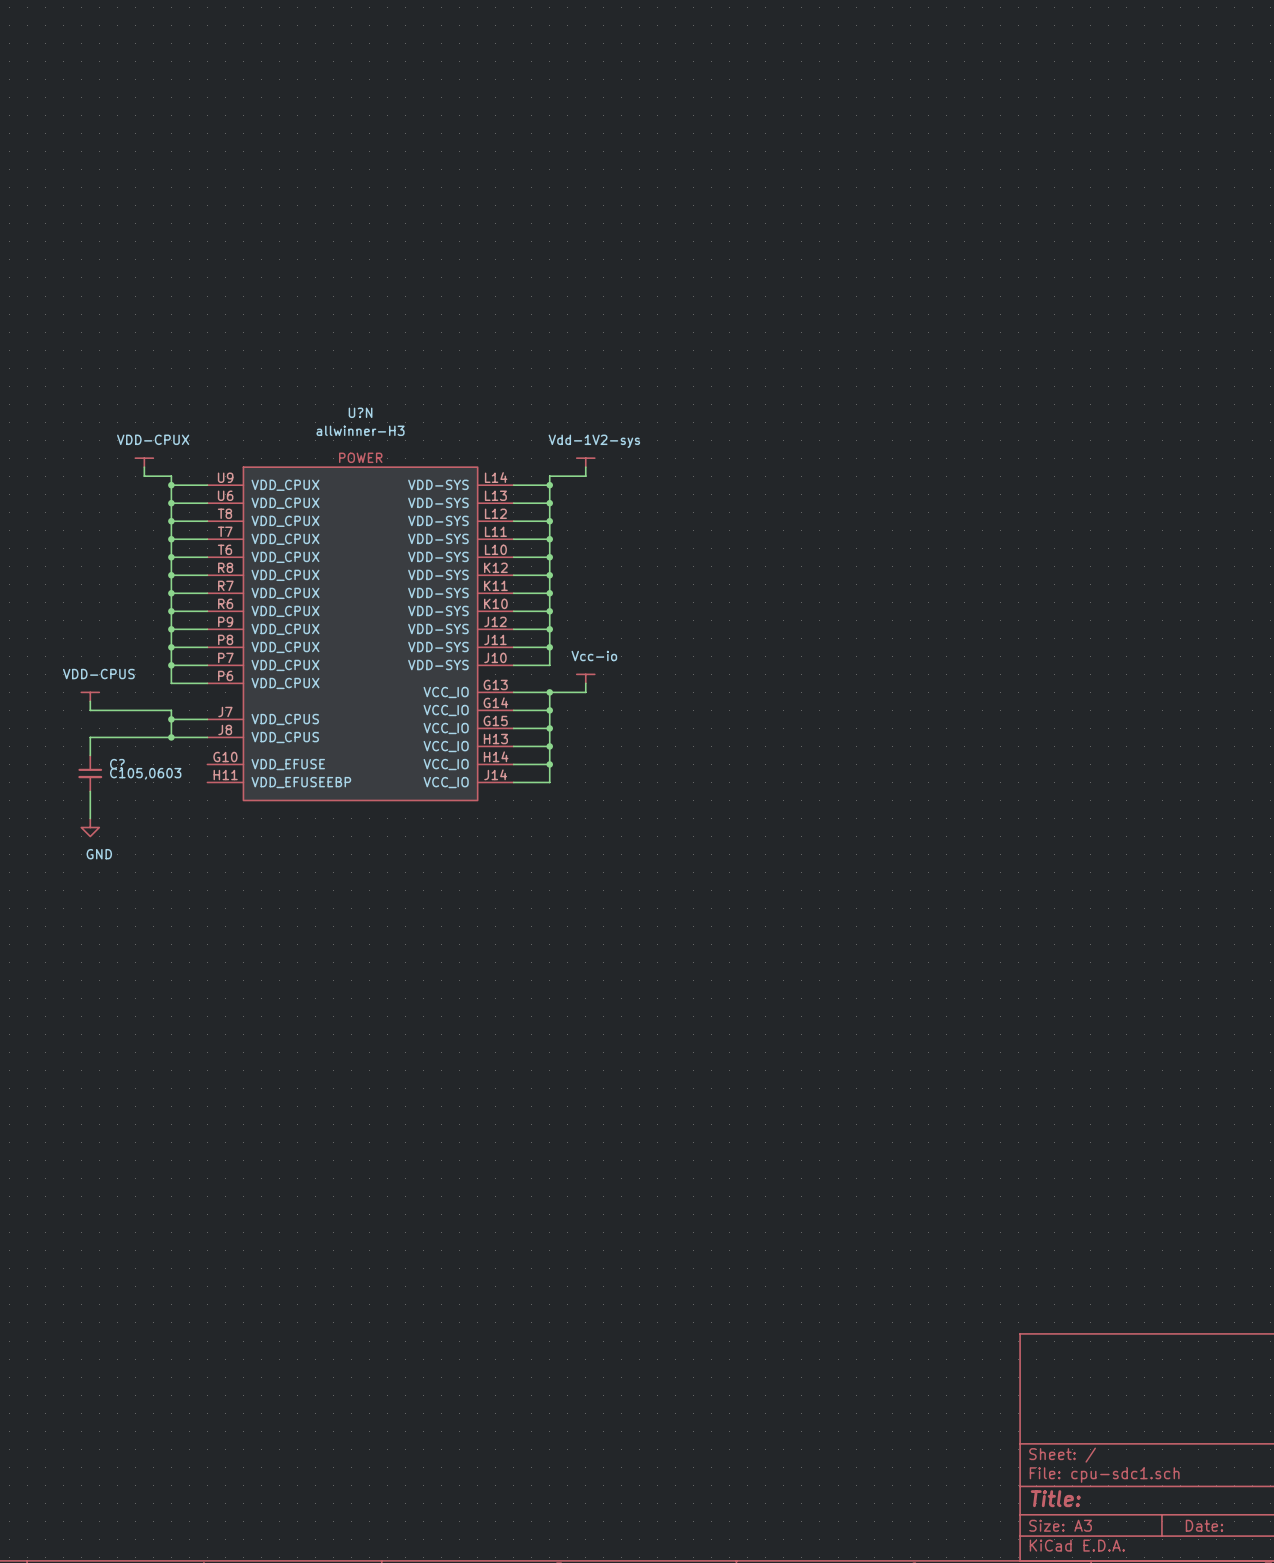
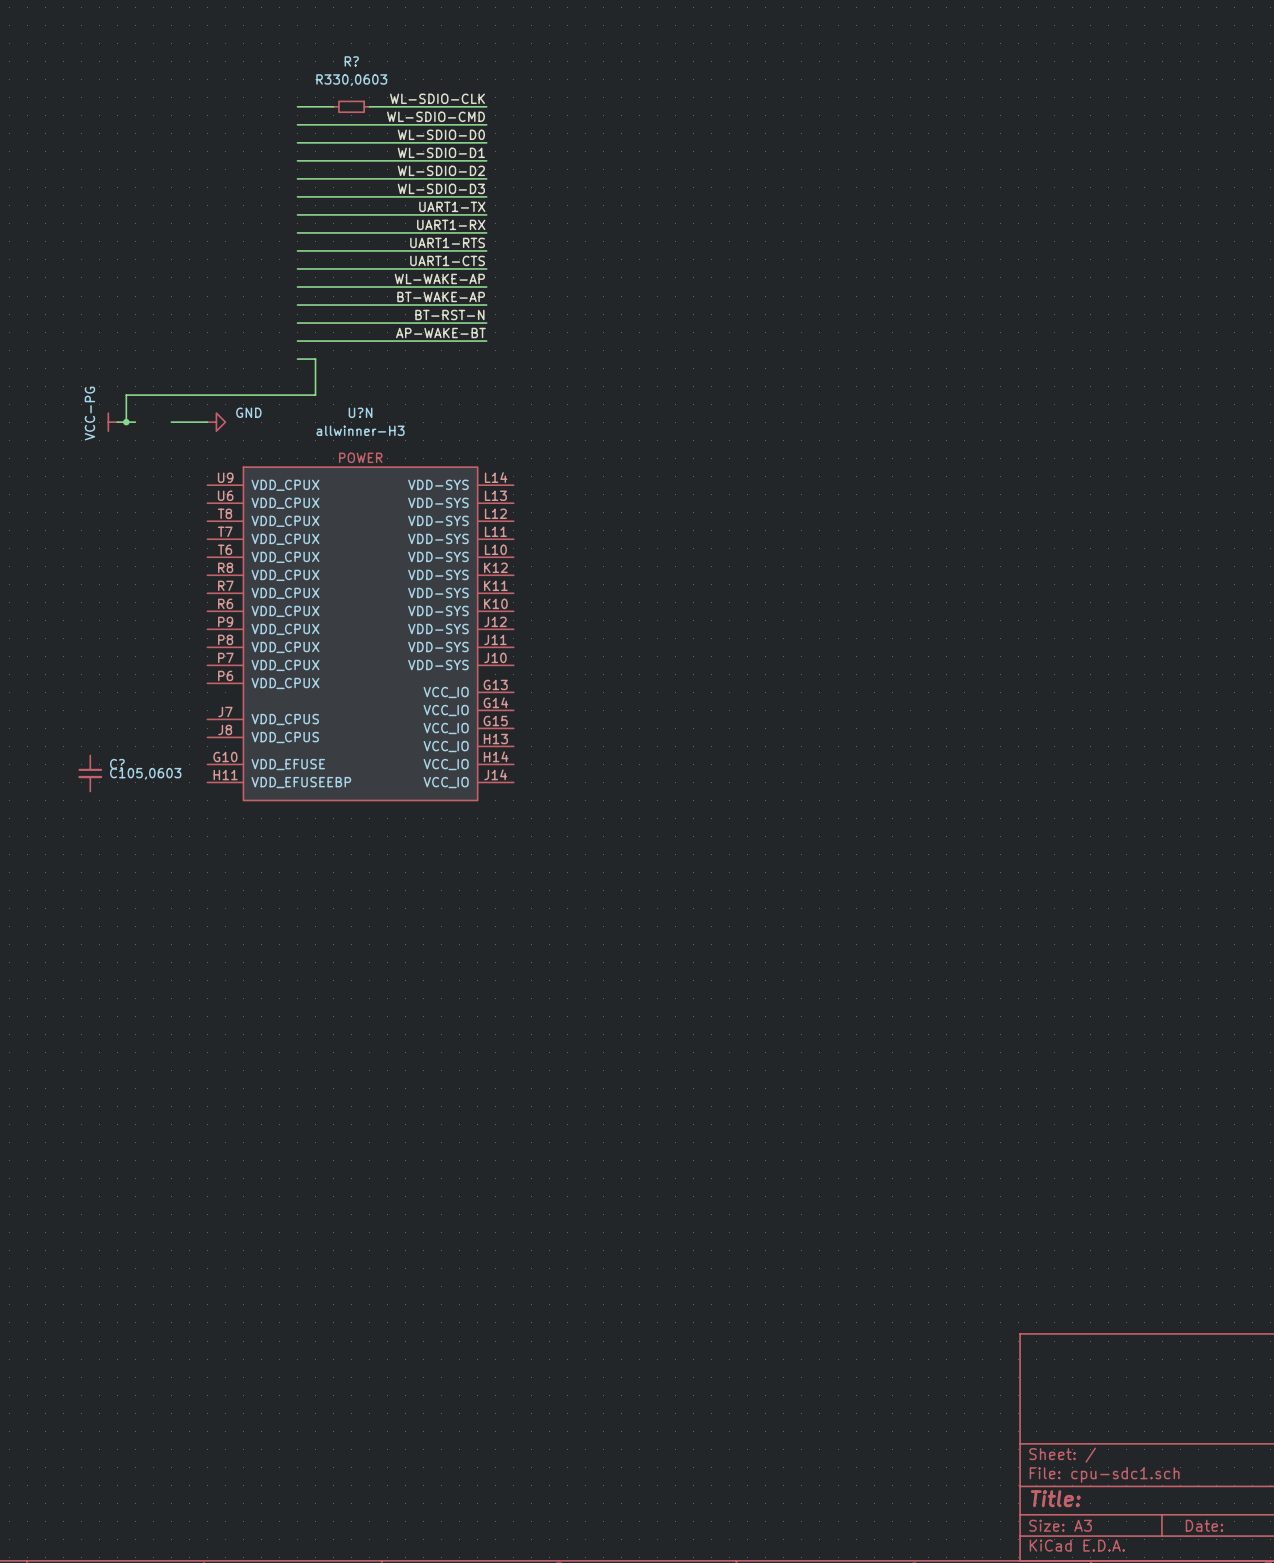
label: none -> WL-SDIO-CLK (437, 98)
wire: none -> (297, 106) (333, 106)
R?: none -> R330,0603 (351, 106)
wire: none -> (369, 106) (486, 106)
label: none -> WL-SDIO-CMD (435, 116)
wire: none -> (297, 124) (486, 124)
label: none -> WL-SDIO-D0 (441, 134)
wire: none -> (297, 142) (486, 142)
label: none -> WL-SDIO-D1 (441, 152)
wire: none -> (297, 160) (486, 160)
label: none -> WL-SDIO-D2 (441, 170)
wire: none -> (297, 178) (486, 178)
label: none -> WL-SDIO-D3 (441, 188)
wire: none -> (297, 196) (486, 196)
label: none -> UART1-TX (452, 206)
wire: none -> (297, 214) (486, 214)
label: none -> UART1-RX (451, 224)
wire: none -> (297, 232) (486, 232)
label: none -> UART1-RTS (447, 242)
wire: none -> (297, 250) (486, 250)
label: none -> UART1-CTS (447, 260)
wire: none -> (297, 268) (486, 268)
label: none -> WL-WAKE-AP (439, 278)
wire: none -> (297, 287) (486, 287)
label: none -> BT-WAKE-AP (441, 296)
wire: none -> (297, 305) (486, 305)
label: none -> BT-RST-N (449, 314)
wire: none -> (297, 323) (486, 323)
label: none -> AP-WAKE-BT (440, 333)
wire: none -> (297, 341) (486, 341)
wire: none -> (297, 359) (315, 359) (315, 395) (126, 395) (126, 422)
power symbol: none -> VCC-PG (112, 422)
wire: none -> (117, 422) (135, 422)
junction: none -> (126, 422)
power symbol: none -> GND (216, 422)
power symbol: VDD-CPUX (144, 462) -> none
power symbol: Vdd-1V2-sys (585, 462) -> none
wire: (144, 467) (144, 476) (171, 476) (171, 683) (207, 683) -> none
wire: (585, 467) (585, 476) (549, 476) (549, 665) (513, 665) -> none
wire: (171, 485) (207, 485) -> (171, 422) (207, 422)
junction: (171, 485) -> none
wire: (513, 485) (549, 485) -> none
junction: (549, 485) -> none
wire: (171, 503) (207, 503) -> none
junction: (171, 503) -> none
wire: (513, 503) (549, 503) -> none
junction: (549, 503) -> none
wire: (171, 521) (207, 521) -> none
junction: (171, 521) -> none
wire: (513, 521) (549, 521) -> none
junction: (549, 521) -> none
wire: (171, 539) (207, 539) -> none
junction: (171, 539) -> none
wire: (513, 539) (549, 539) -> none
junction: (549, 539) -> none
wire: (171, 557) (207, 557) -> none
junction: (171, 557) -> none
wire: (513, 557) (549, 557) -> none
junction: (549, 557) -> none
wire: (171, 575) (207, 575) -> none
junction: (171, 575) -> none
wire: (513, 575) (549, 575) -> none
junction: (549, 575) -> none
wire: (171, 593) (207, 593) -> none
junction: (171, 593) -> none
wire: (513, 593) (549, 593) -> none
junction: (549, 593) -> none
wire: (171, 611) (207, 611) -> none
junction: (171, 611) -> none
wire: (513, 611) (549, 611) -> none
junction: (549, 611) -> none
wire: (171, 629) (207, 629) -> none
junction: (171, 629) -> none
wire: (513, 629) (549, 629) -> none
junction: (549, 629) -> none
wire: (171, 647) (207, 647) -> none
junction: (171, 647) -> none
wire: (513, 647) (549, 647) -> none
junction: (549, 647) -> none
wire: (171, 665) (207, 665) -> none
junction: (171, 665) -> none
power symbol: Vcc-io (585, 678) -> none
wire: (585, 683) (585, 692) (513, 692) -> none
wire: (549, 692) (549, 782) (513, 782) -> none
junction: (549, 692) -> none
power symbol: VDD-CPUS (90, 696) -> none
wire: (90, 701) (90, 710) (171, 710) (171, 737) -> none
wire: (513, 710) (549, 710) -> none
junction: (549, 710) -> none
wire: (171, 719) (207, 719) -> none
junction: (171, 719) -> none
wire: (513, 728) (549, 728) -> none
junction: (549, 728) -> none
junction: (171, 737) -> none
wire: (207, 737) (90, 737) (90, 755) -> none
wire: (513, 746) (549, 746) -> none
junction: (549, 746) -> none
wire: (513, 764) (549, 764) -> none
junction: (549, 764) -> none
wire: (90, 791) (90, 818) -> none
power symbol: GND (90, 827) -> none

